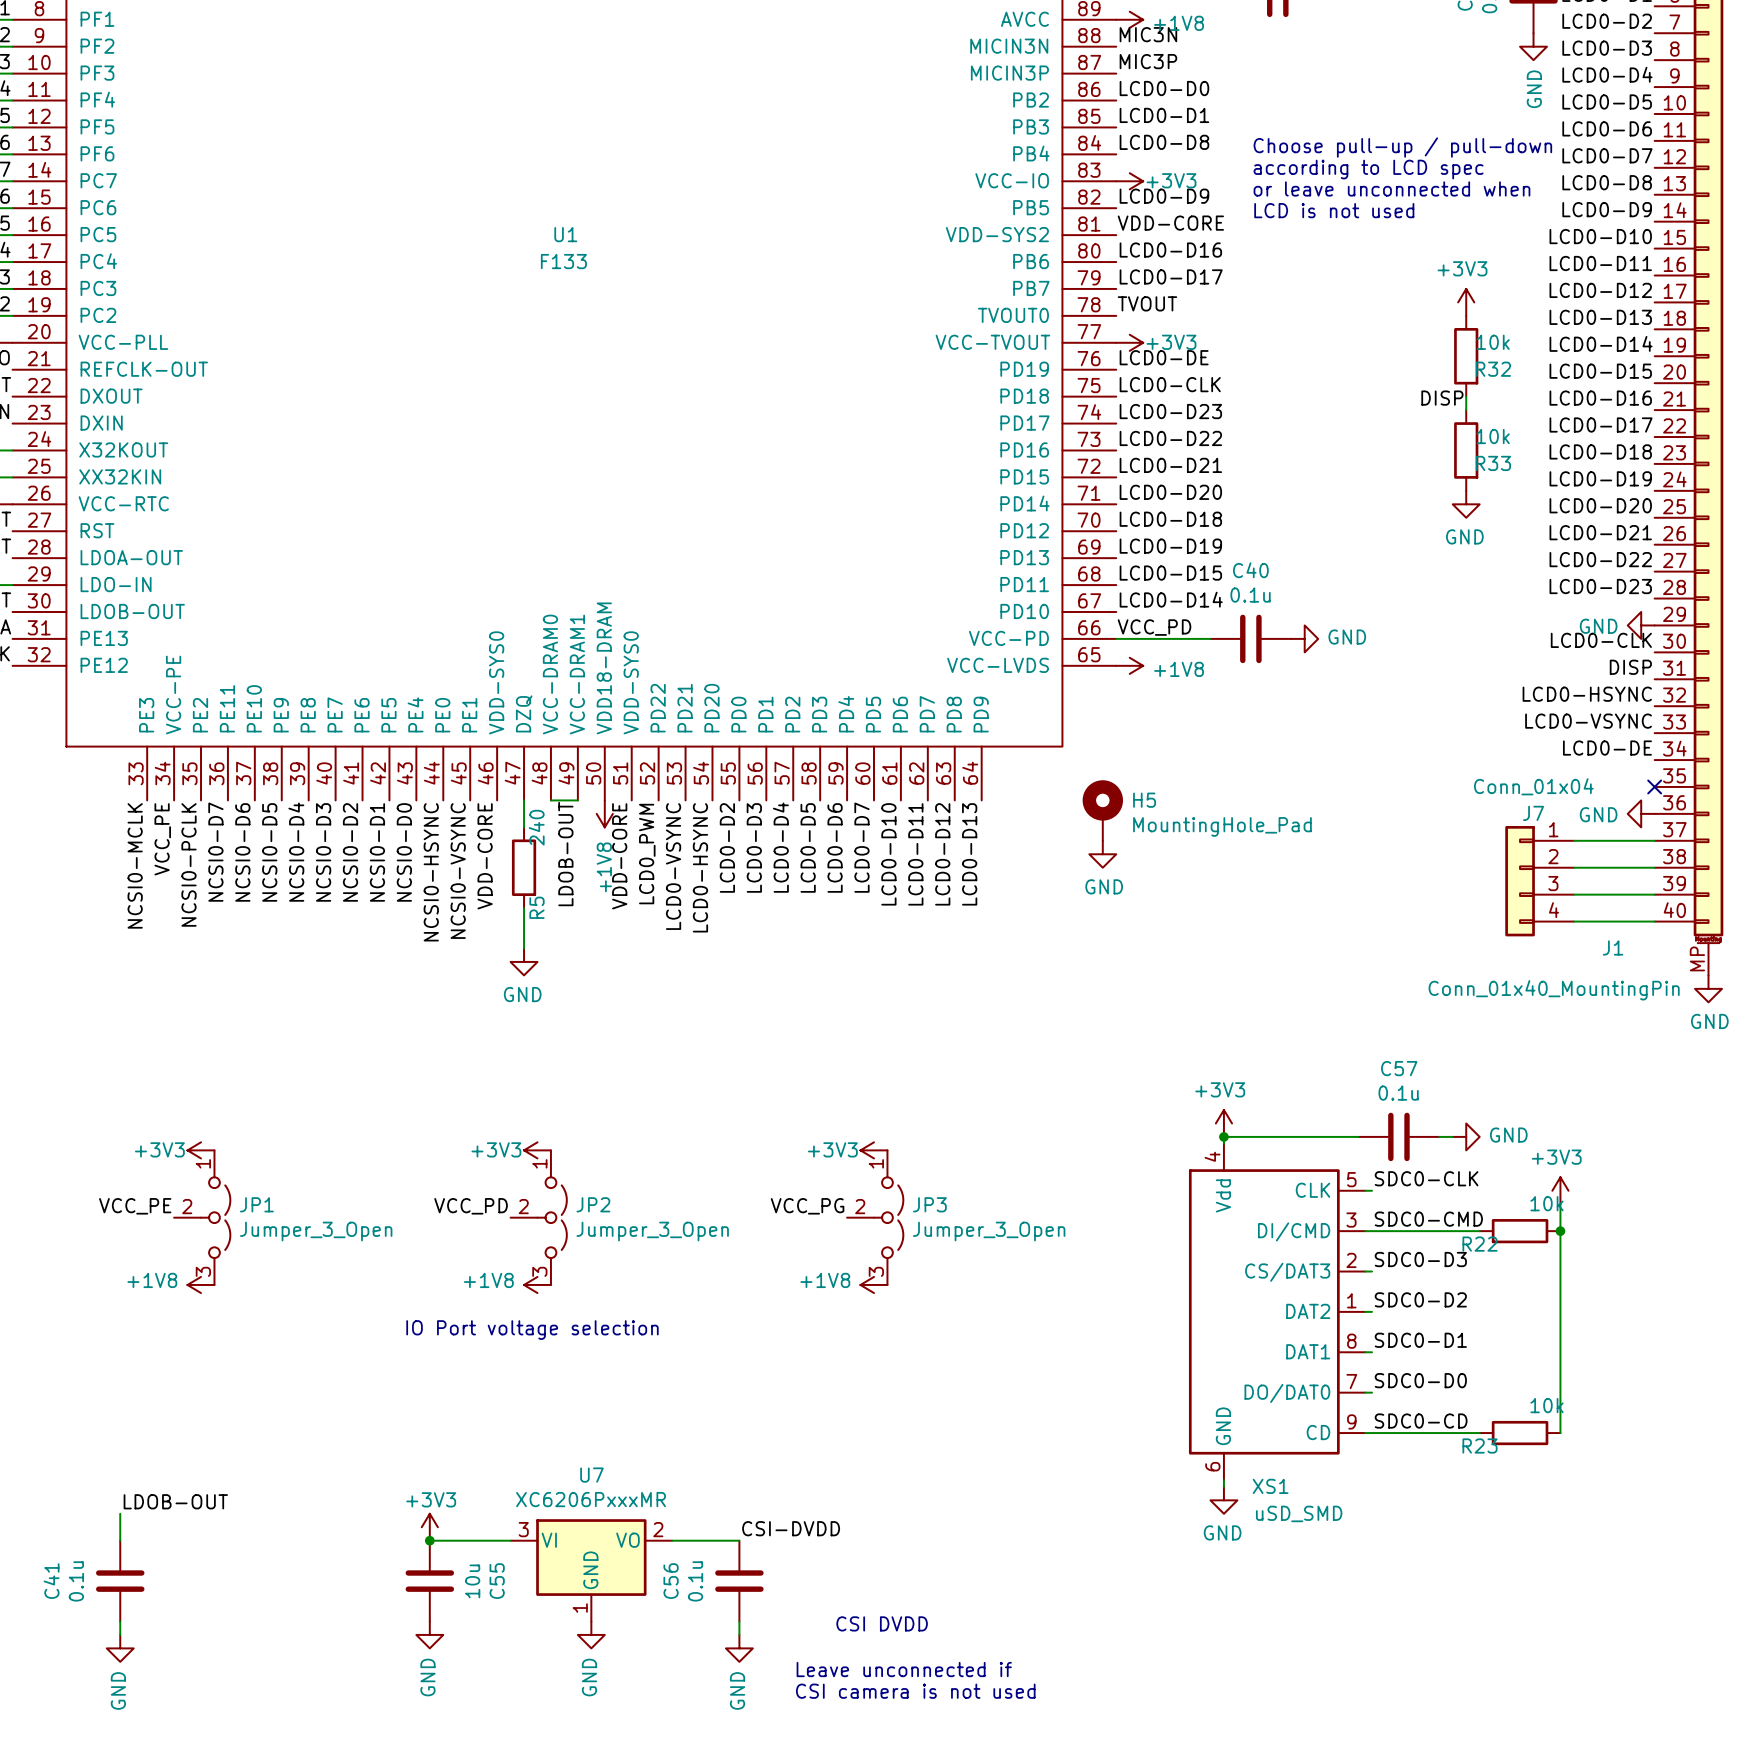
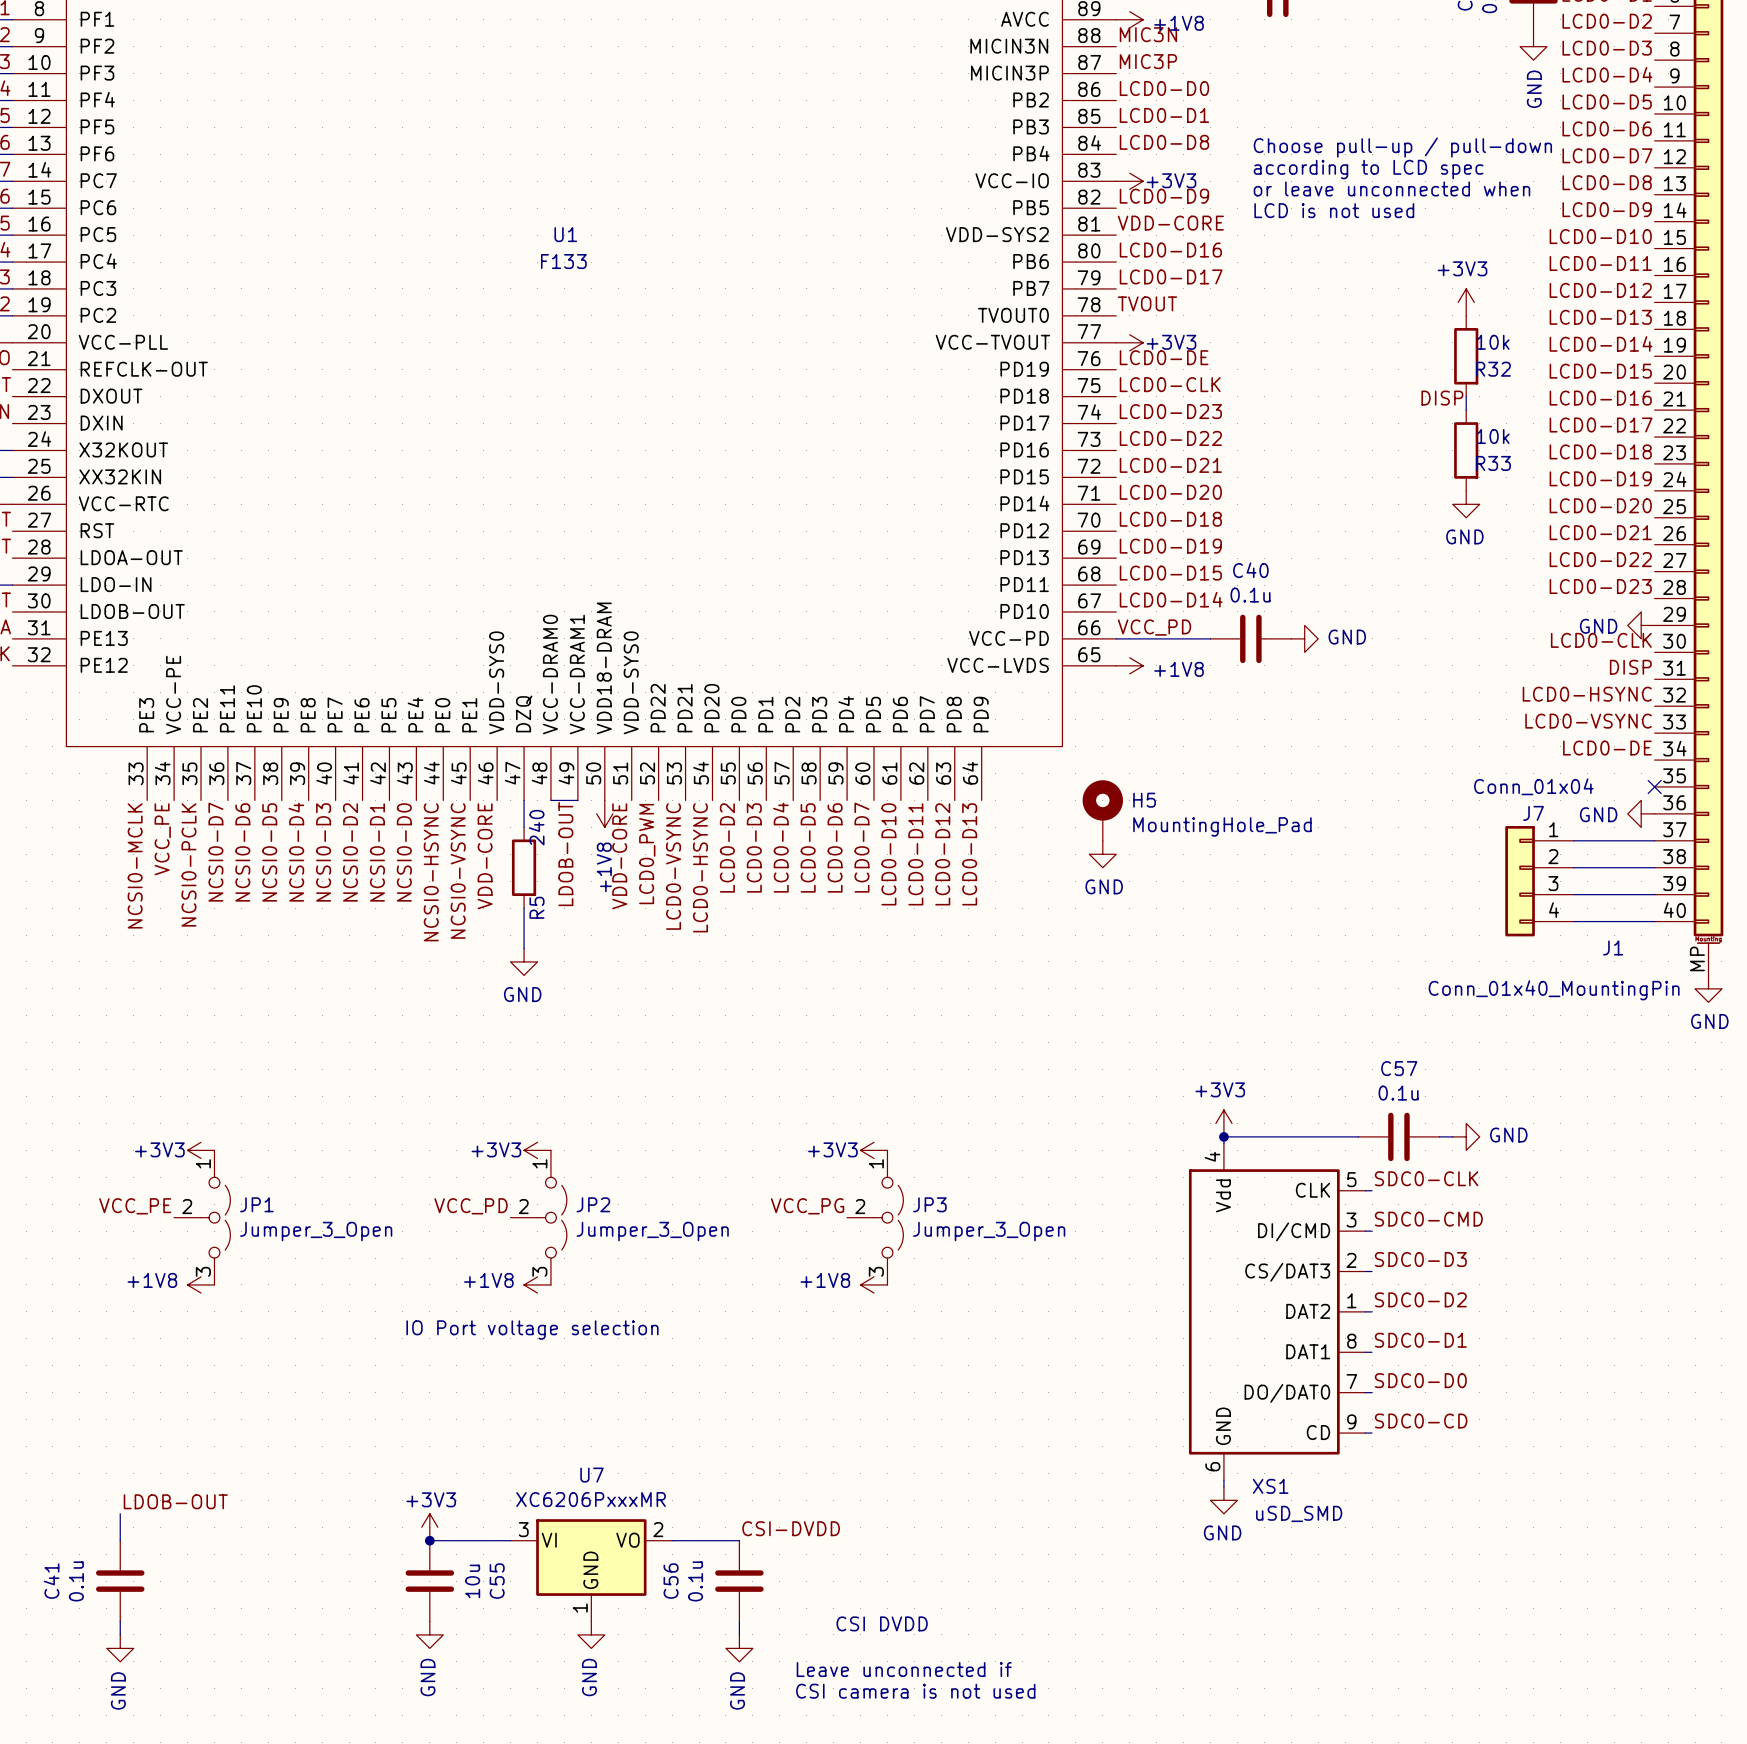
power symbol: +3V3 (1560, 1190) -> none
wire: (1560, 1204) (1560, 1433) -> none
wire: (1372, 1231) (1479, 1231) -> none
R22: 10k (1520, 1231) -> none
junction: (1560, 1231) -> none
wire: (1372, 1433) (1479, 1433) -> none
R23: 10k (1520, 1433) -> none

